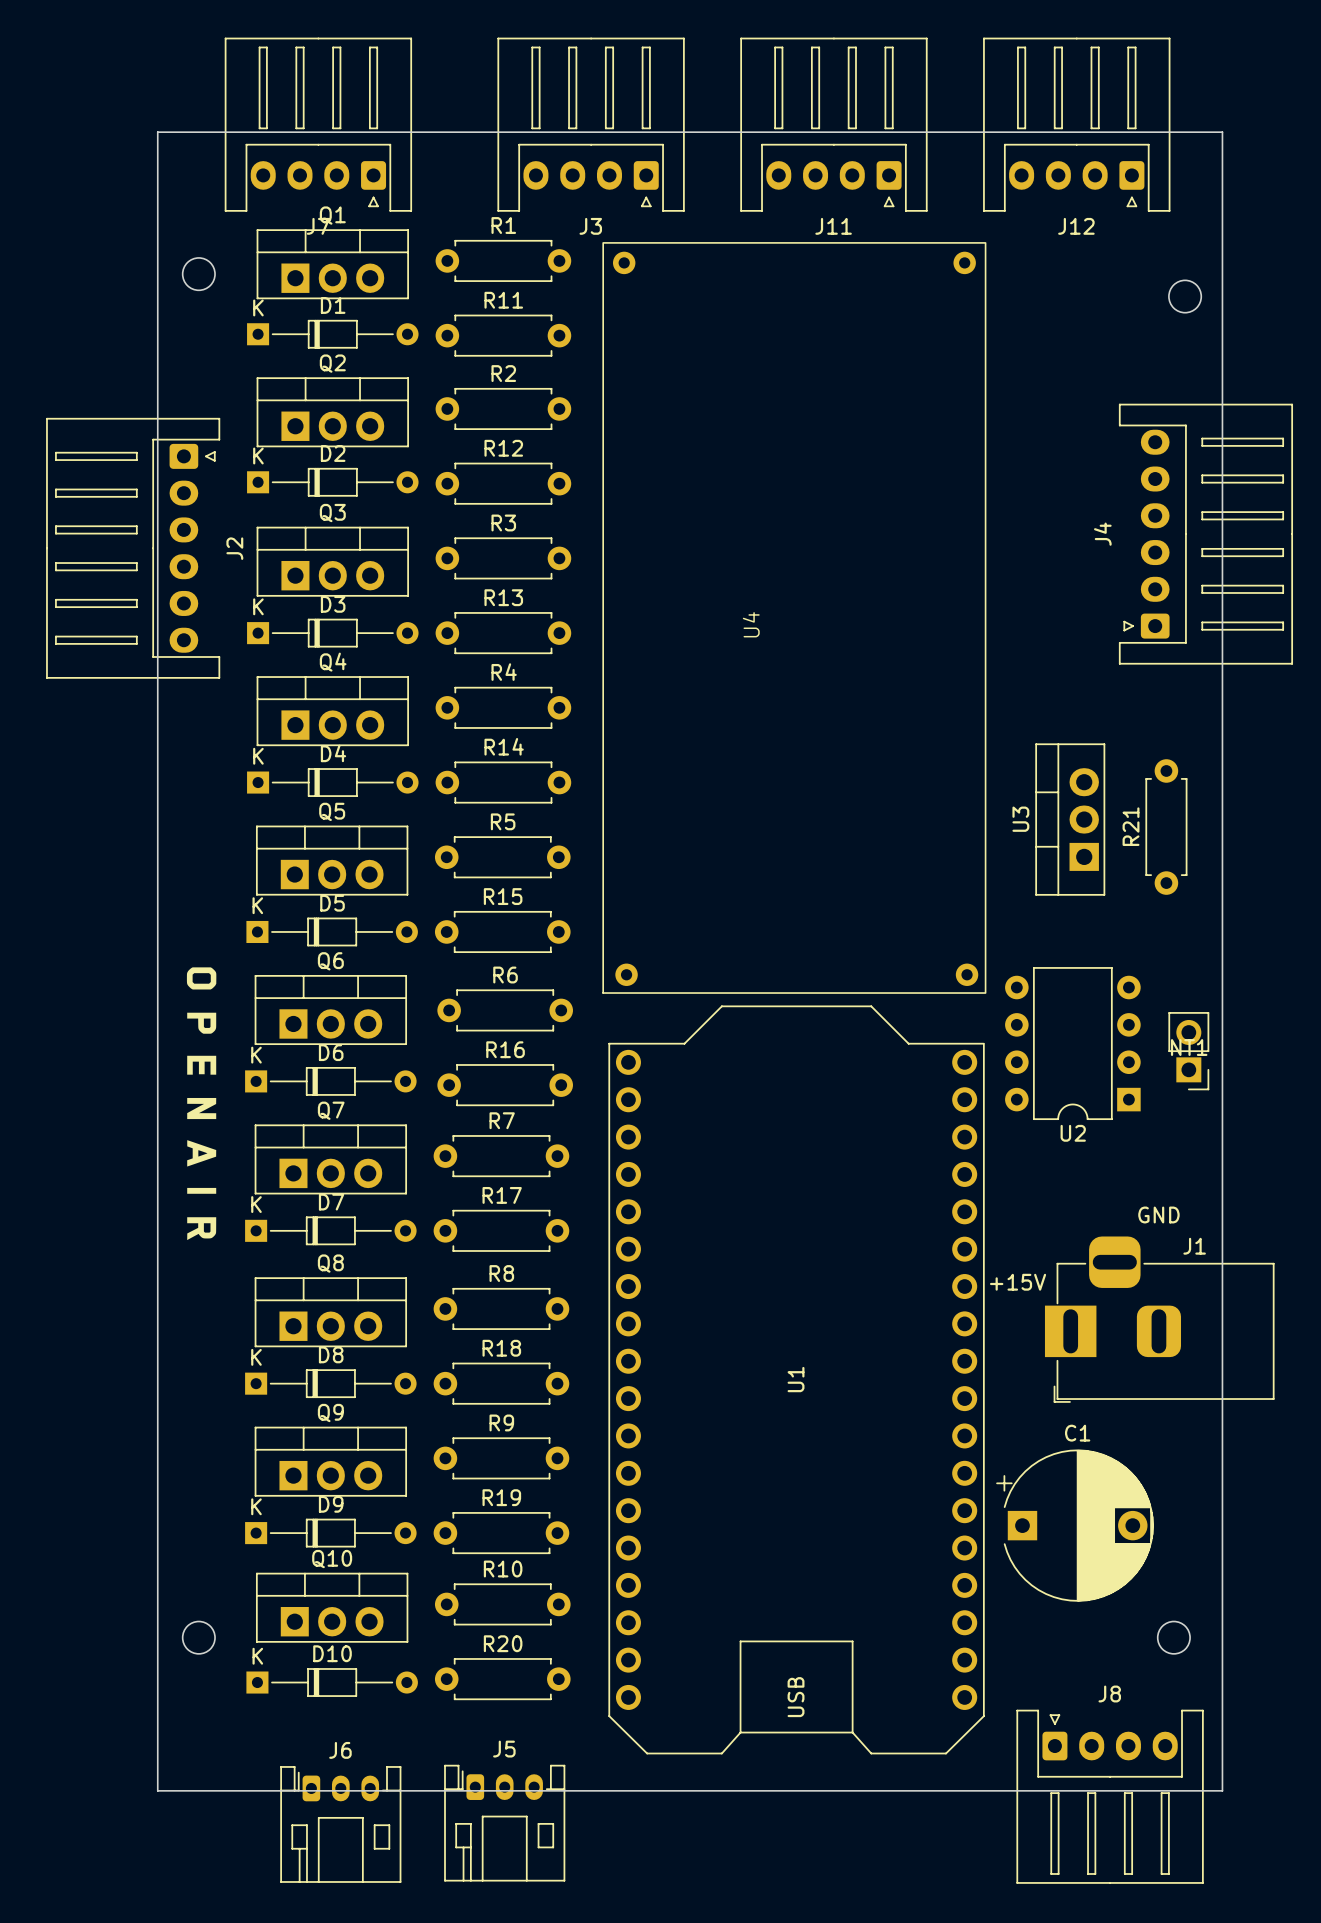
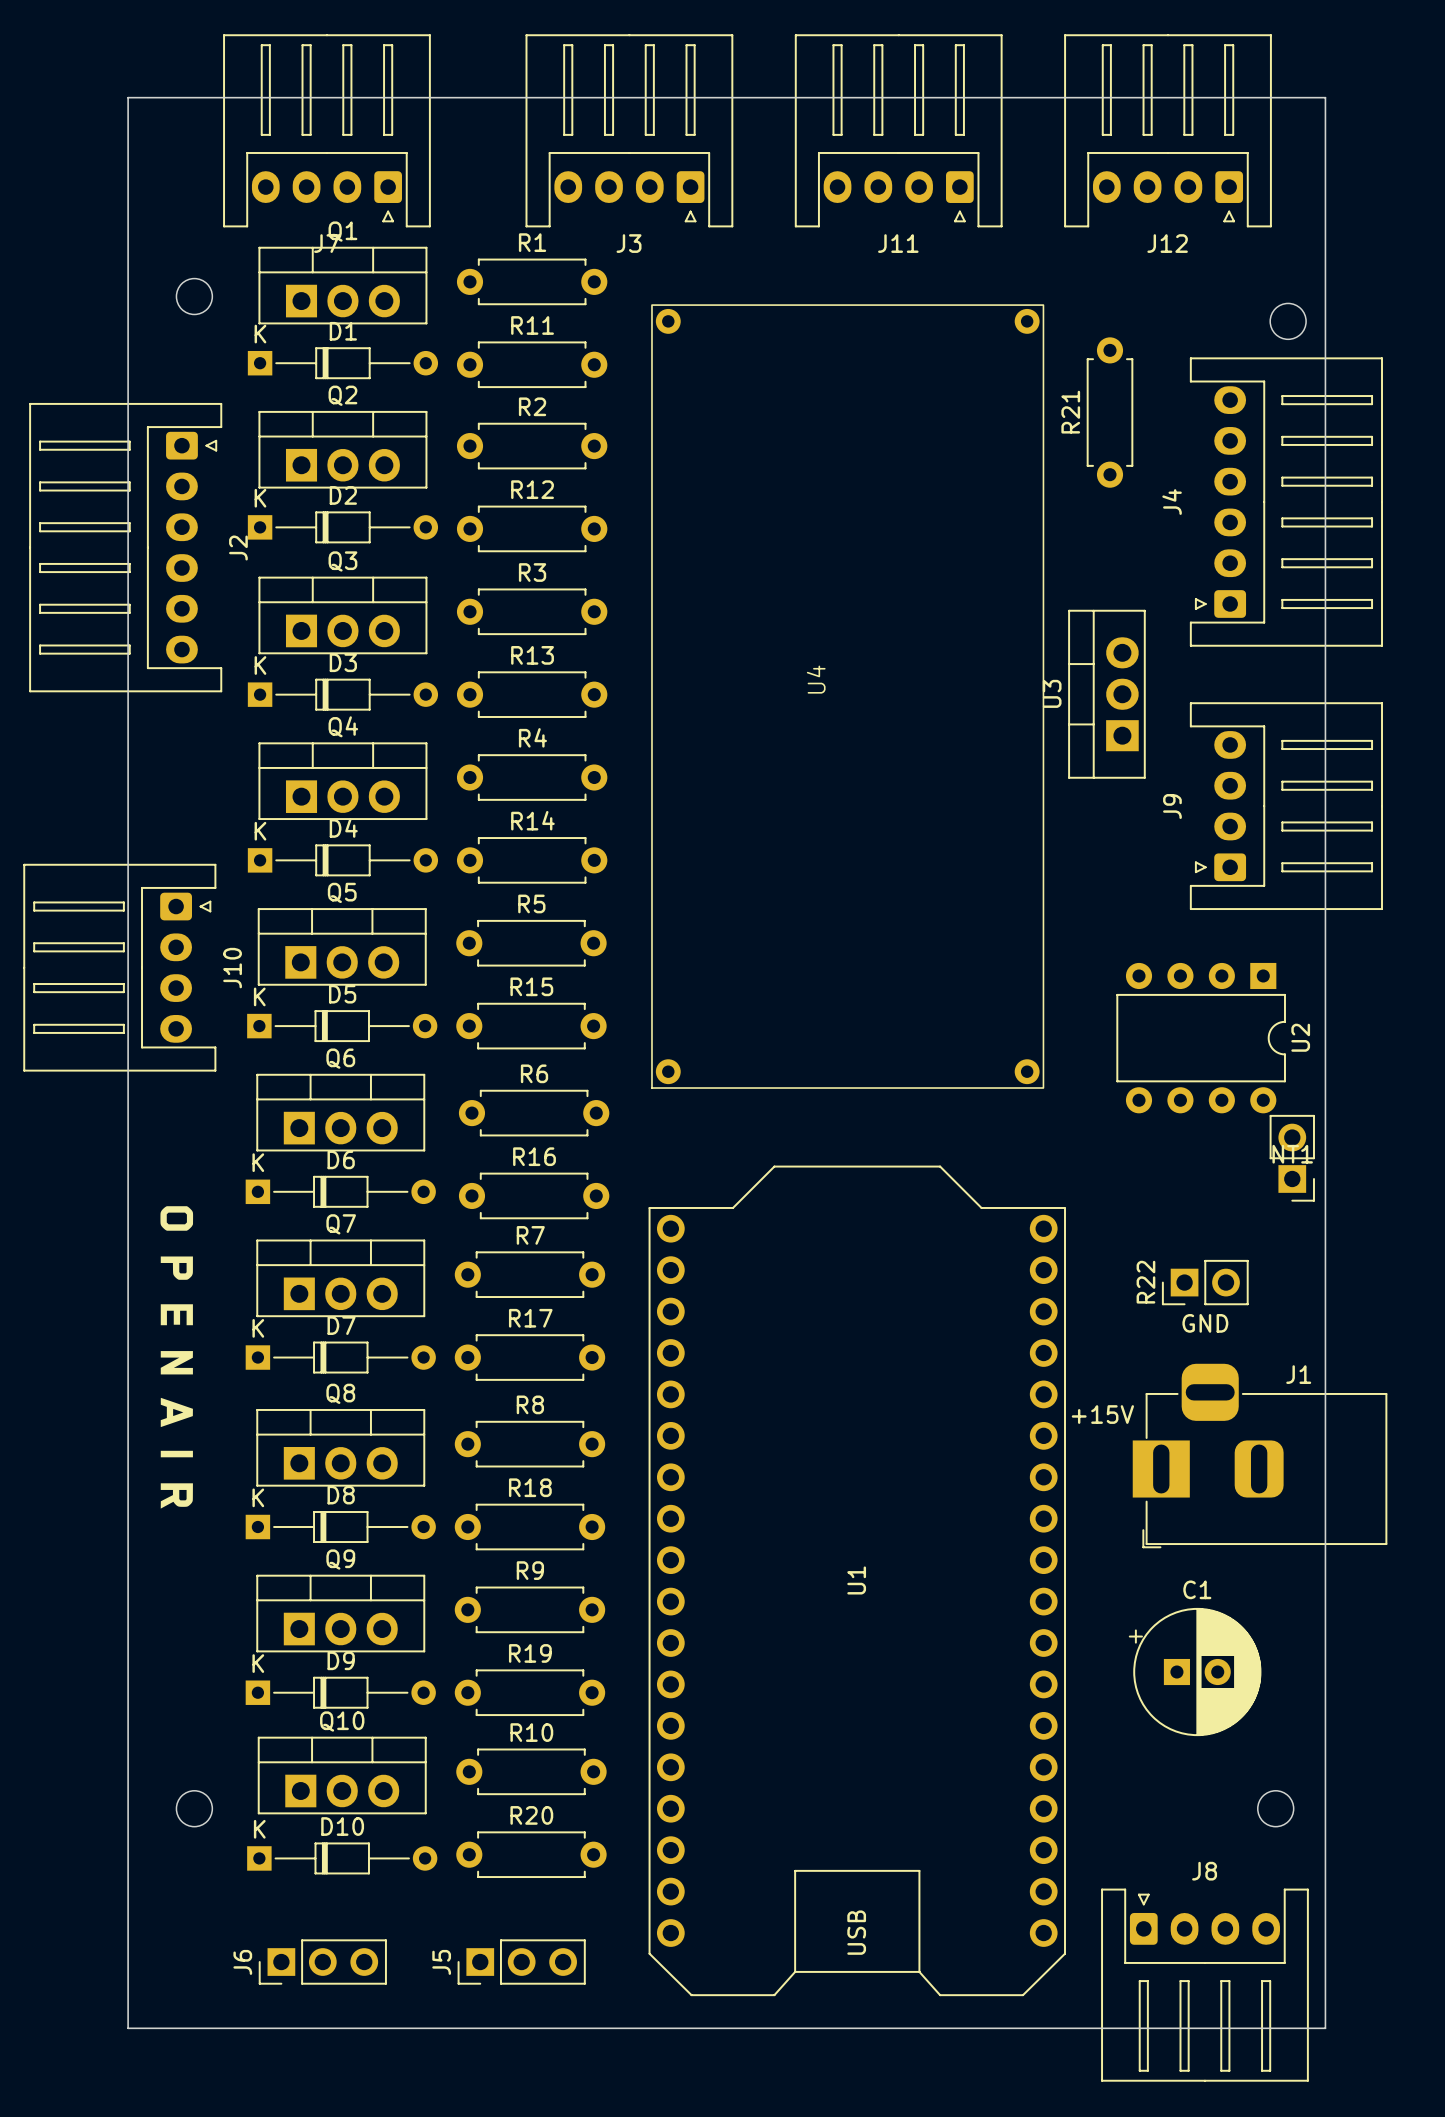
board edge: (157, 132) (1222, 132) (1222, 1790) (157, 1790) (157, 132) -> (128, 97) (128, 2028) (1325, 2028) (1325, 97) (128, 97)
U4 footprint: [602, 242, 987, 994] -> [651, 304, 1045, 1089]
J4 position: (1205, 534) -> (1286, 502)
J2 position: (133, 548) -> (125, 547)
J9: none -> (1286, 806)
U3 position: (1070, 819) -> (1106, 694)
R21 position: (1166, 827) -> (1110, 412)
J10: none -> (119, 967)
U2 rotation: 0° (1072, 1043) -> 90° counterclockwise (1201, 1038)
U2 position: (1072, 1043) -> (1201, 1038)
drawing position: (201, 1103) -> (176, 1357)
R22: none -> (1205, 1282)
text position: GND (1158, 1214) -> GND (1205, 1323)
U1 position: (796, 1379) -> (857, 1580)
C1 footprint: [996, 1449, 1154, 1602] -> [1128, 1607, 1262, 1737]
J5 name position: J5 (504, 1749) -> J5 (441, 1962)
J6 name position: J6 (340, 1750) -> J6 (242, 1962)
J5 footprint: [444, 1764, 566, 1882] -> [457, 1939, 586, 1985]
J6 footprint: [280, 1766, 402, 1883] -> [258, 1939, 387, 1985]

